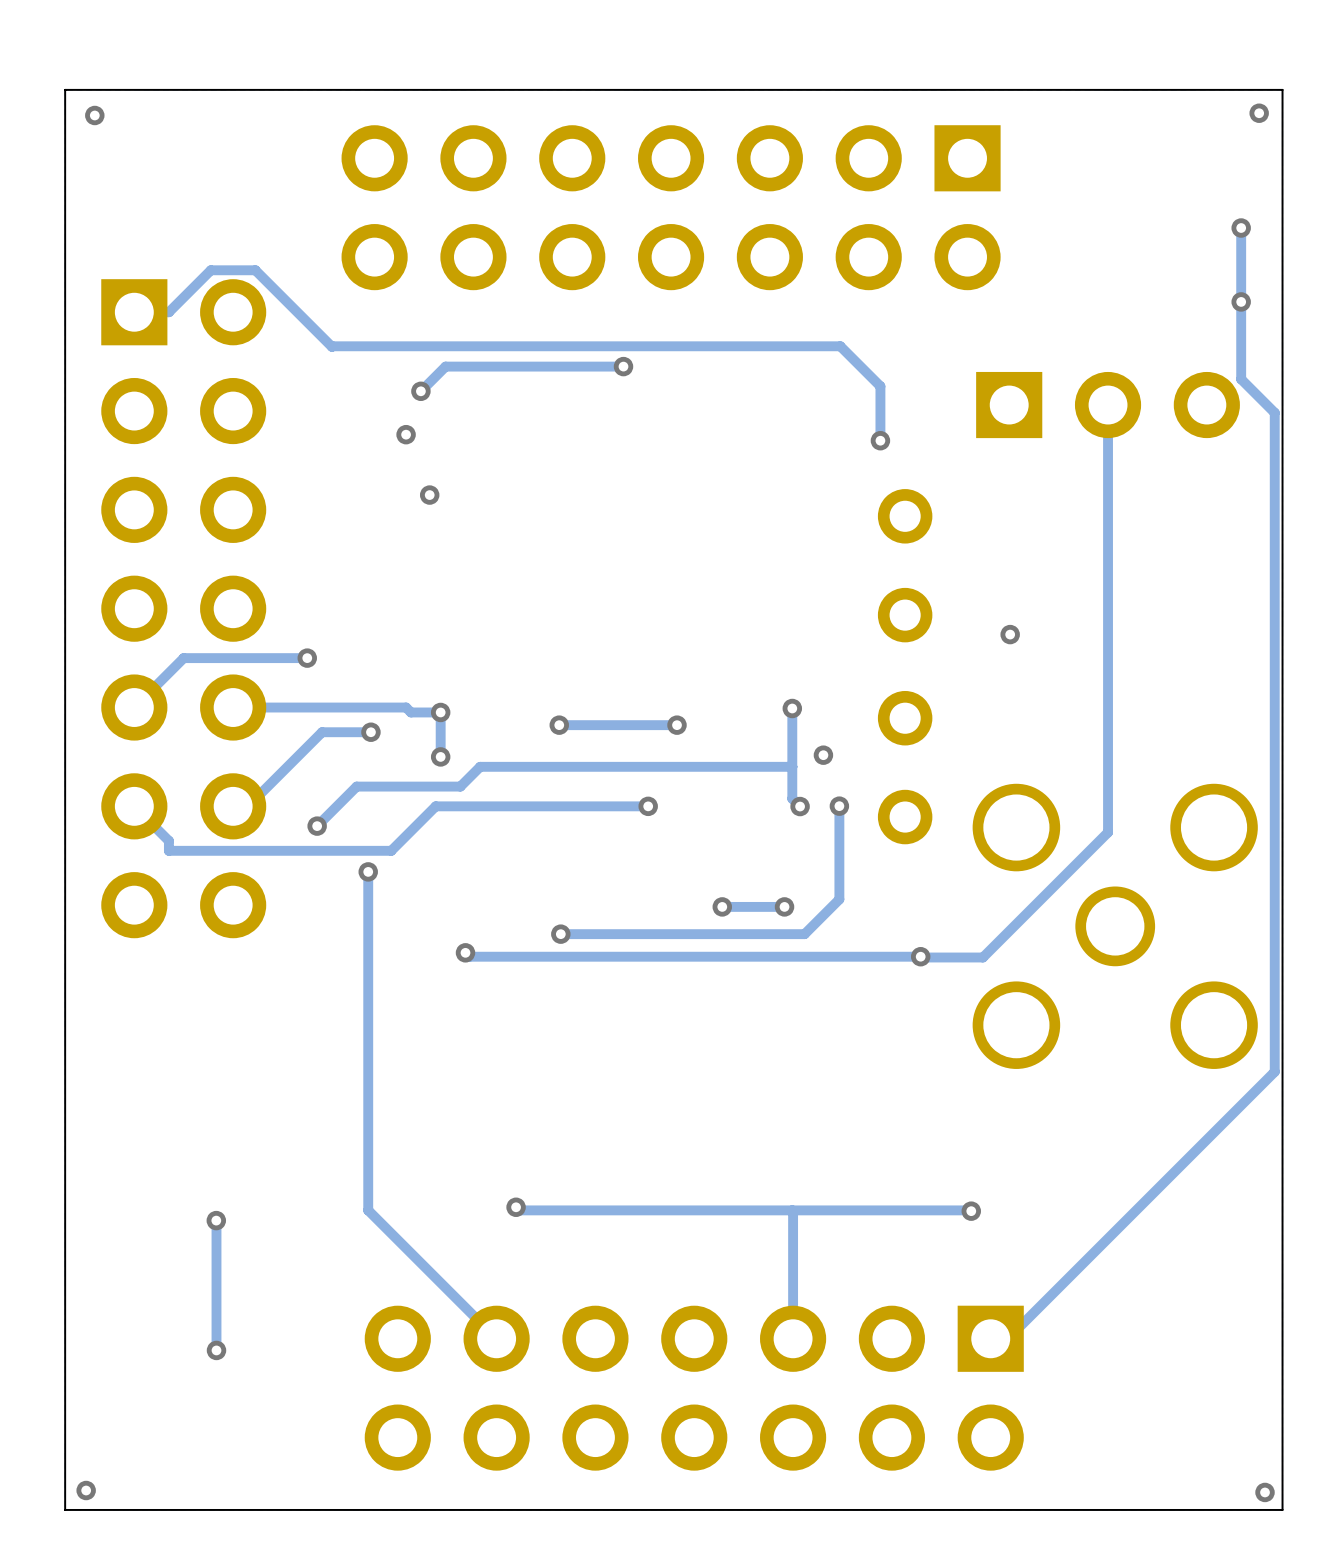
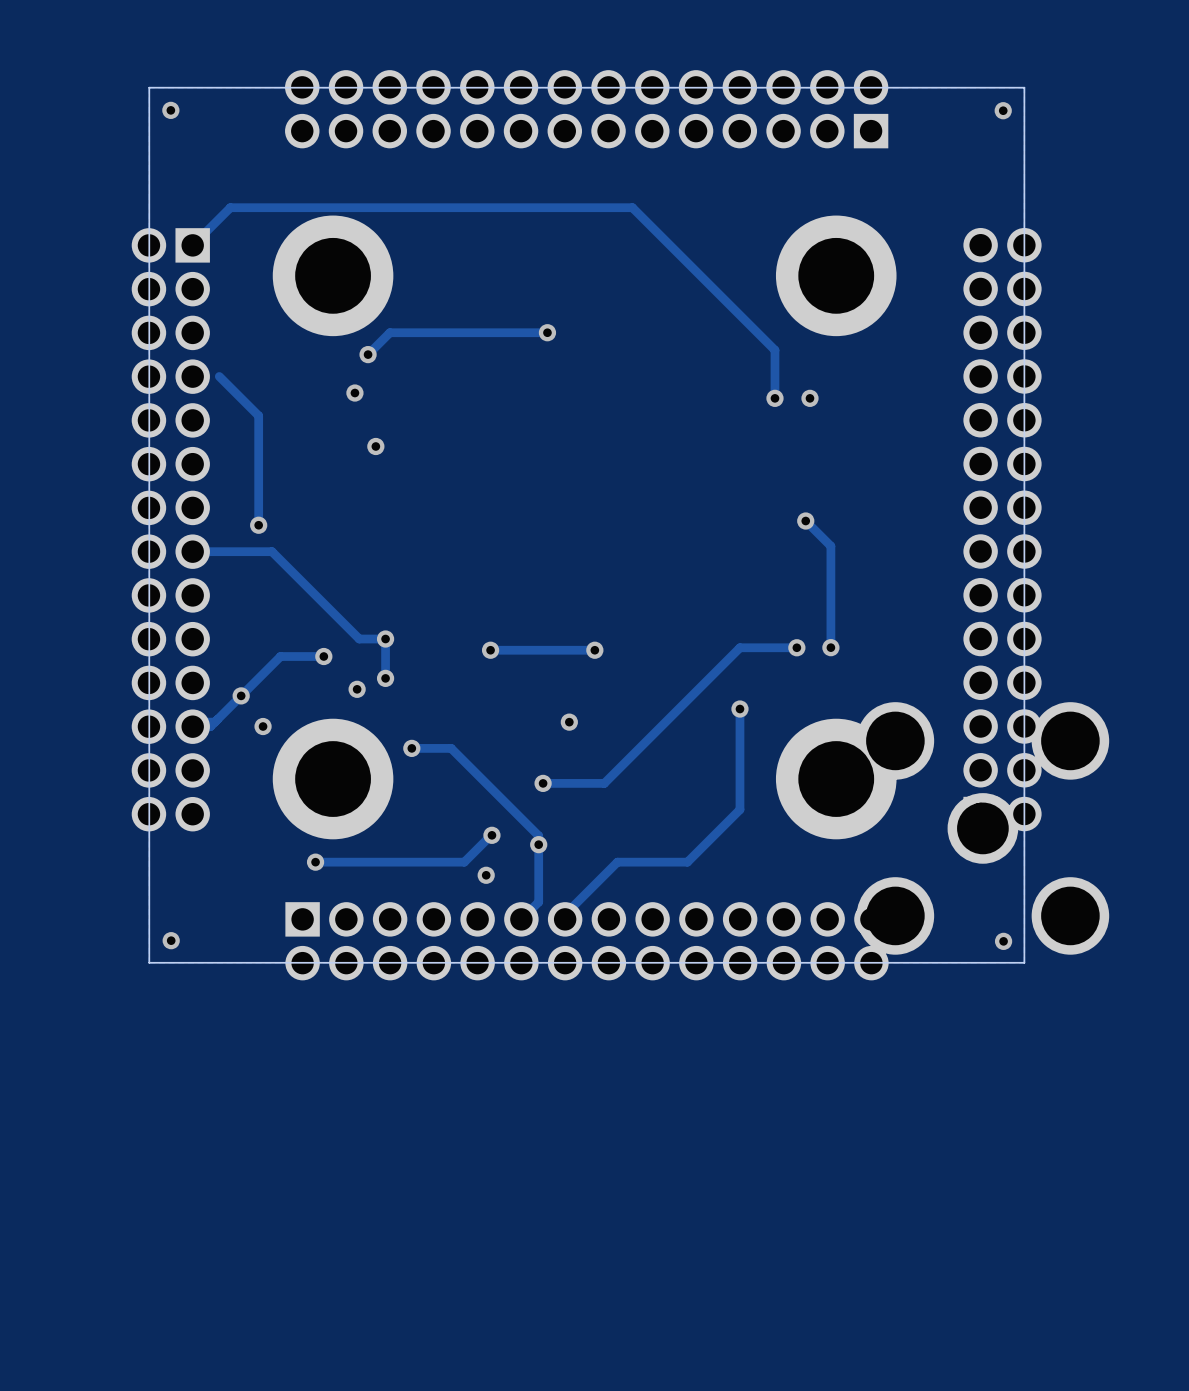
board edge: (1162, 89) (1282, 89) (1282, 1509) (65, 1509) (65, 89) (173, 89) -> (1024, 87) (1024, 962) (149, 962) (149, 87)
via: (1259, 113) -> none
part: none -> (586, 109)
via position: (94, 115) -> (170, 110)
via: none -> (1003, 110)
part: (671, 207) -> none
track: (1241, 228) (1241, 379) (1274, 412) (1274, 1071) (1007, 1338) (990, 1338) -> none
via: (1241, 228) -> none
part footprint: [101, 279, 267, 939] -> [131, 228, 210, 832]
via: (1241, 301) -> none
part: none -> (333, 275)
part: none -> (836, 275)
track: (134, 312) (168, 312) (210, 270) (255, 270) (331, 346) -> none
track: (840, 346) (332, 346) -> (739, 314) (632, 207) (230, 207) (192, 245)
track: (1108, 405) (1108, 832) (982, 957) (469, 956) (465, 952) -> none
part: (1108, 405) -> none
track: none -> (219, 376) (258, 415) (258, 525)
via: none -> (809, 398)
part: (905, 565) -> none
track: none -> (805, 521) (830, 546) (830, 647)
via: none -> (805, 521)
via: none -> (258, 525)
part: none -> (1002, 529)
via: (1010, 634) -> none
track: (307, 658) (183, 658) (134, 707) -> none
via: (307, 658) -> none
track: (406, 707) (233, 707) -> (354, 634) (271, 551) (192, 551)
track: (792, 708) (792, 798) (800, 806) -> none
via: (792, 708) -> none
track: none -> (796, 647) (739, 647) (604, 783) (543, 783)
via: none -> (796, 647)
via: none -> (830, 647)
via: (823, 755) -> none
track: (792, 766) (480, 766) (460, 786) (356, 786) (317, 826) -> none
part: (905, 767) -> none
via: none -> (357, 689)
via: none -> (241, 695)
track: none -> (739, 709) (739, 809) (687, 862) (617, 862) (565, 914) (565, 919)
track: (648, 806) (435, 806) (391, 850) (168, 850) (168, 840) (134, 806) -> none
via: (800, 806) -> none
track: (839, 806) (839, 899) (804, 934) (560, 934) -> none
via position: (839, 806) -> (739, 709)
via position: (317, 826) -> (263, 726)
track: none -> (411, 748) (451, 748) (538, 835) (538, 902) (521, 919)
via: none -> (411, 748)
part: none -> (333, 779)
part: none -> (836, 779)
track: (368, 871) (368, 1210) (496, 1338) -> none
via: (368, 871) -> none
via: none -> (543, 783)
via: (722, 906) -> none
track: (784, 906) (722, 906) -> none
via: (784, 906) -> none
track: none -> (486, 840) (464, 862) (315, 862)
via: none -> (538, 844)
via: (465, 952) -> none
via: (920, 956) -> none
via: none -> (315, 862)
via: none -> (486, 875)
via: none -> (171, 940)
part: none -> (587, 941)
via: none -> (1003, 941)
track: (516, 1207) (519, 1210) (971, 1211) -> none
via: (516, 1207) -> none
track: (792, 1210) (793, 1338) -> none
via: (971, 1211) -> none
track: (216, 1220) (216, 1350) -> none
via: (216, 1220) -> none
via: (216, 1350) -> none
part: (694, 1388) -> none
via: (86, 1490) -> none
via: (1265, 1492) -> none

